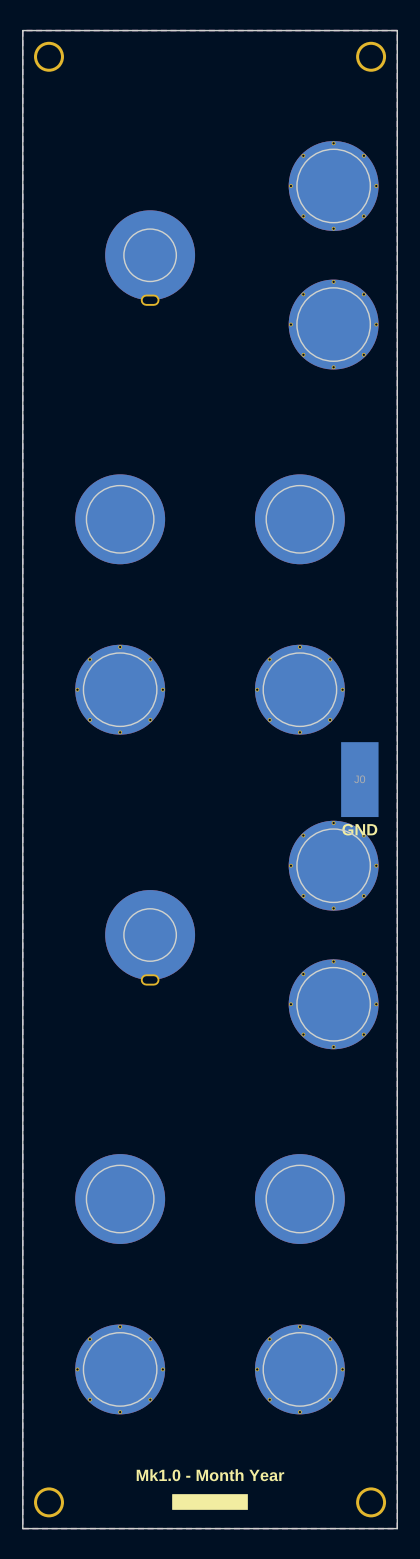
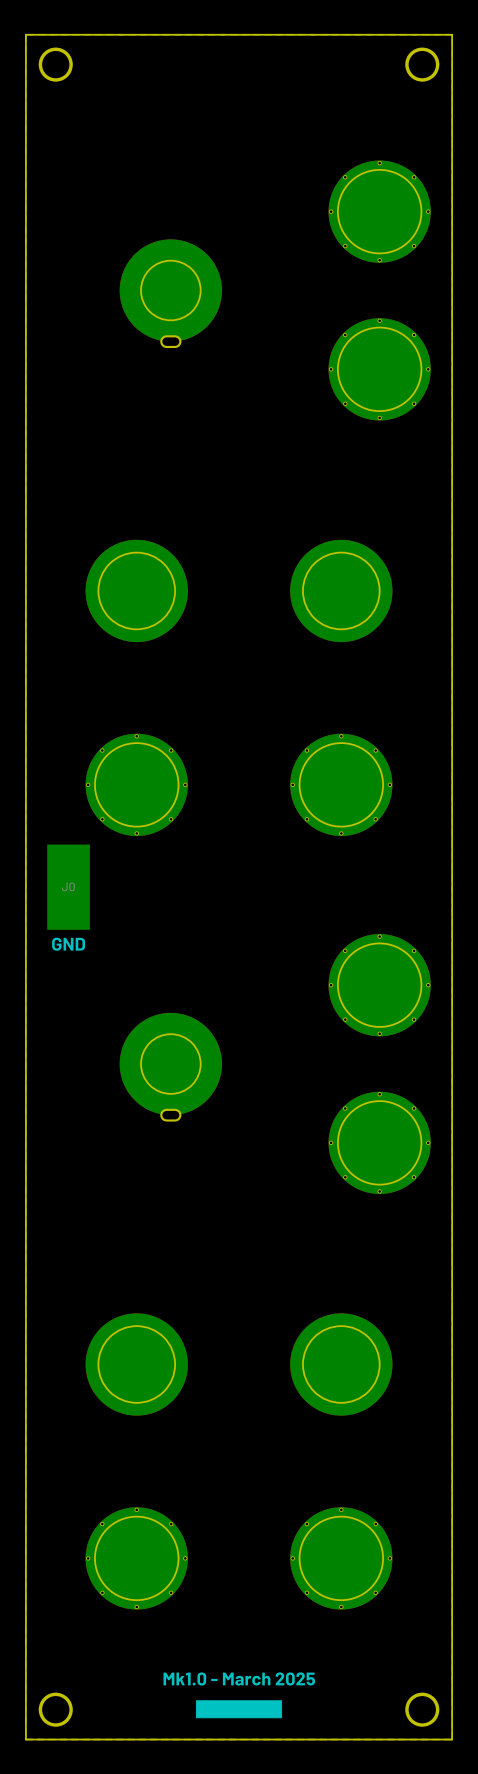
J0 position: (359, 779) -> (68, 887)
text: Mk1.0 - Month Year (210, 1475) -> Mk1.0 - March 2025 (239, 1678)

